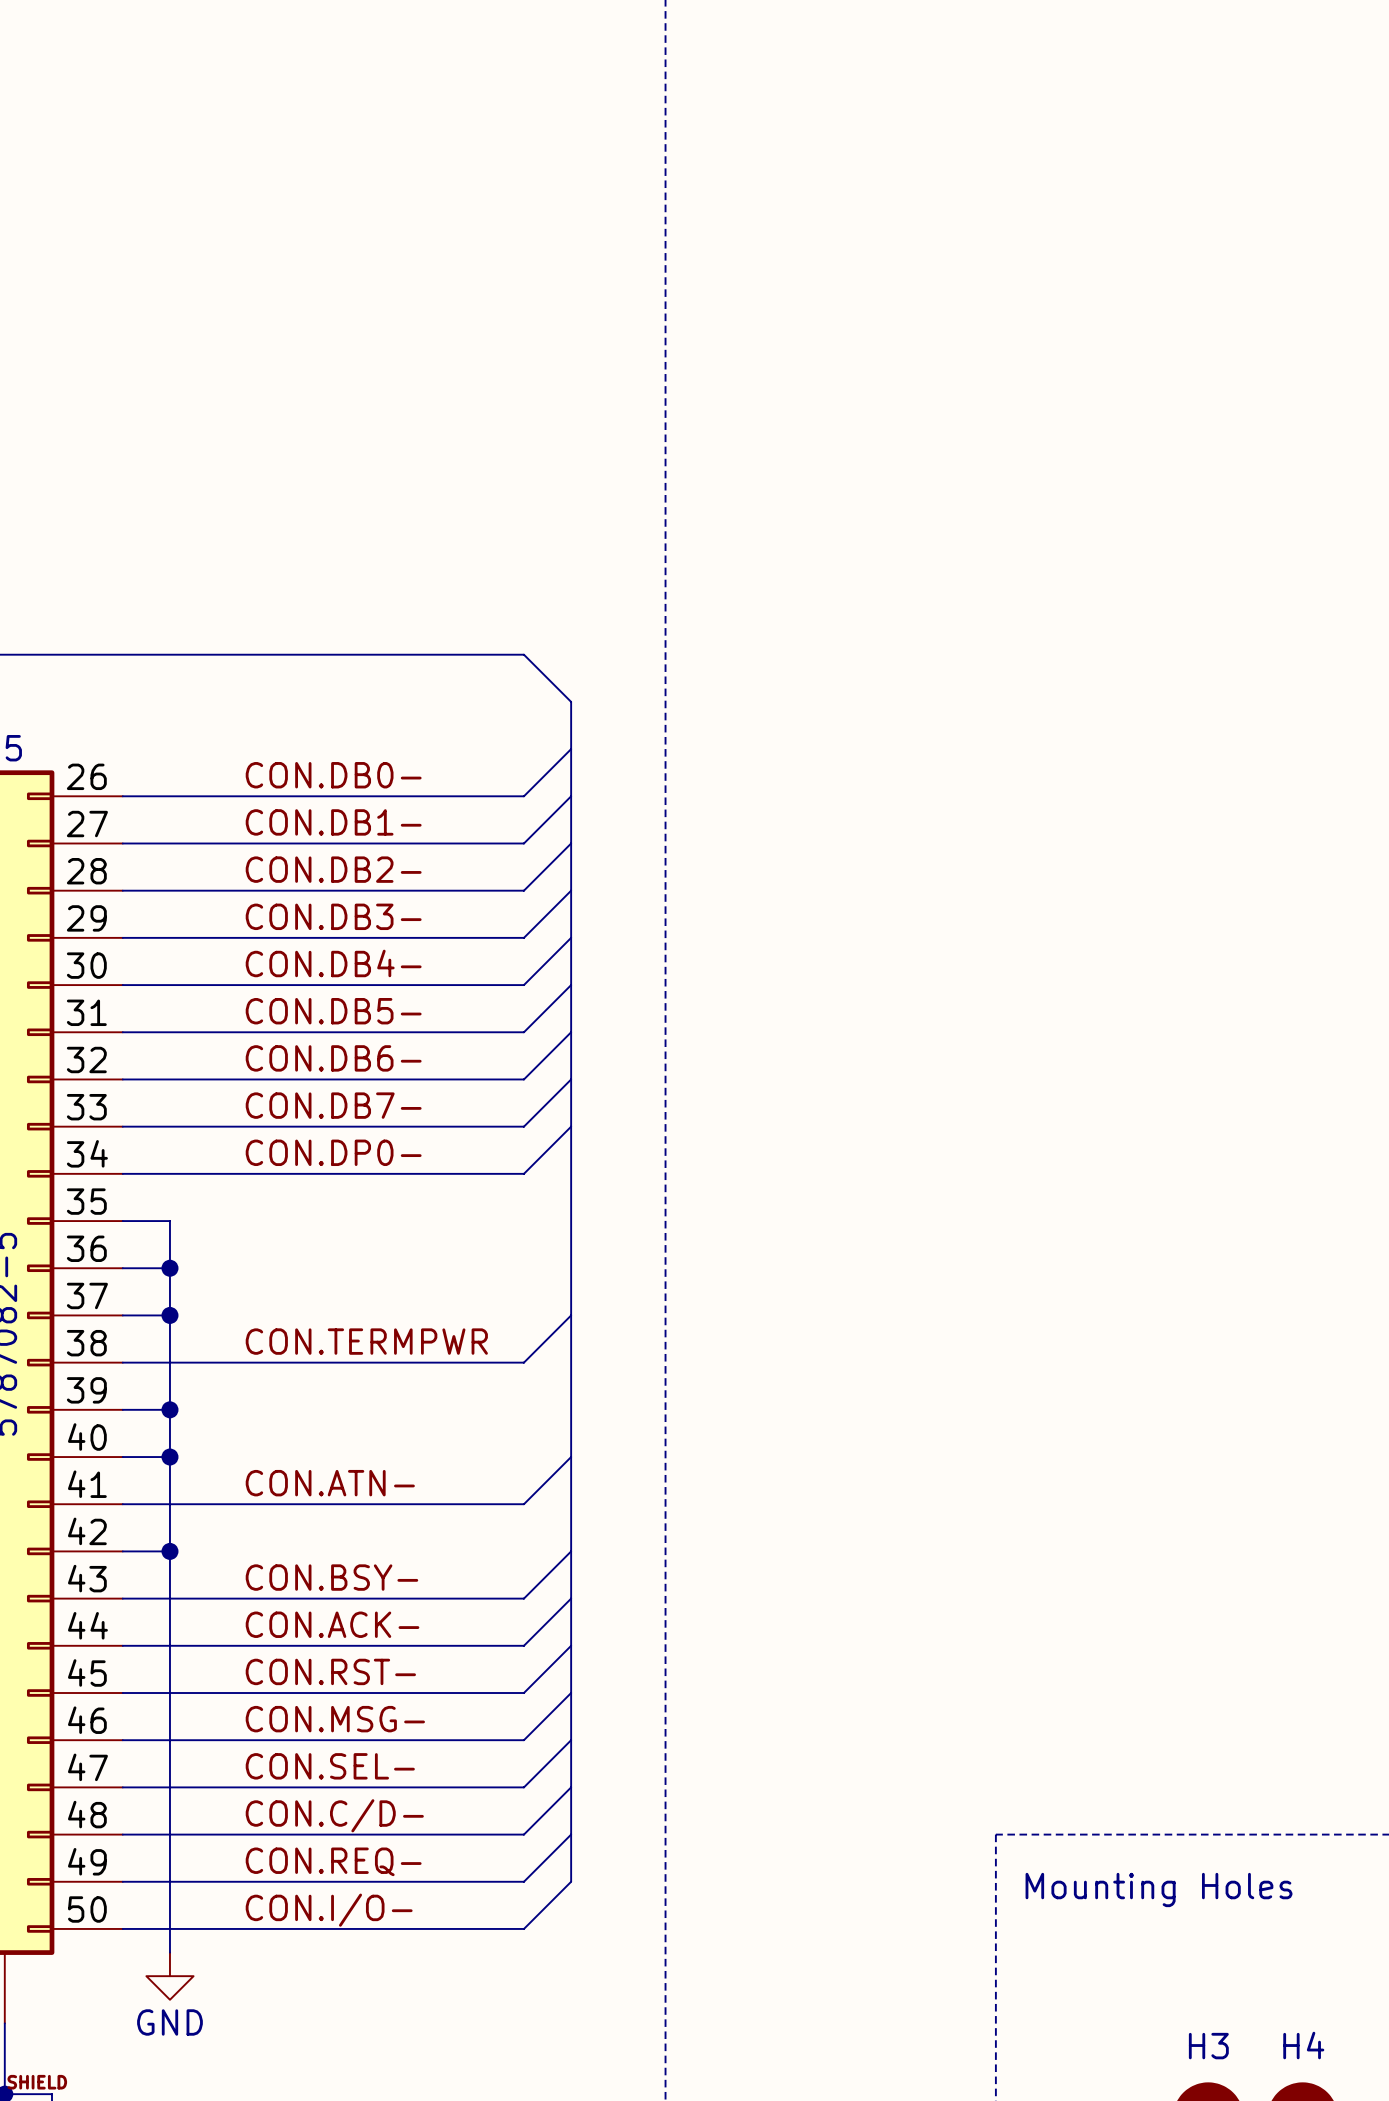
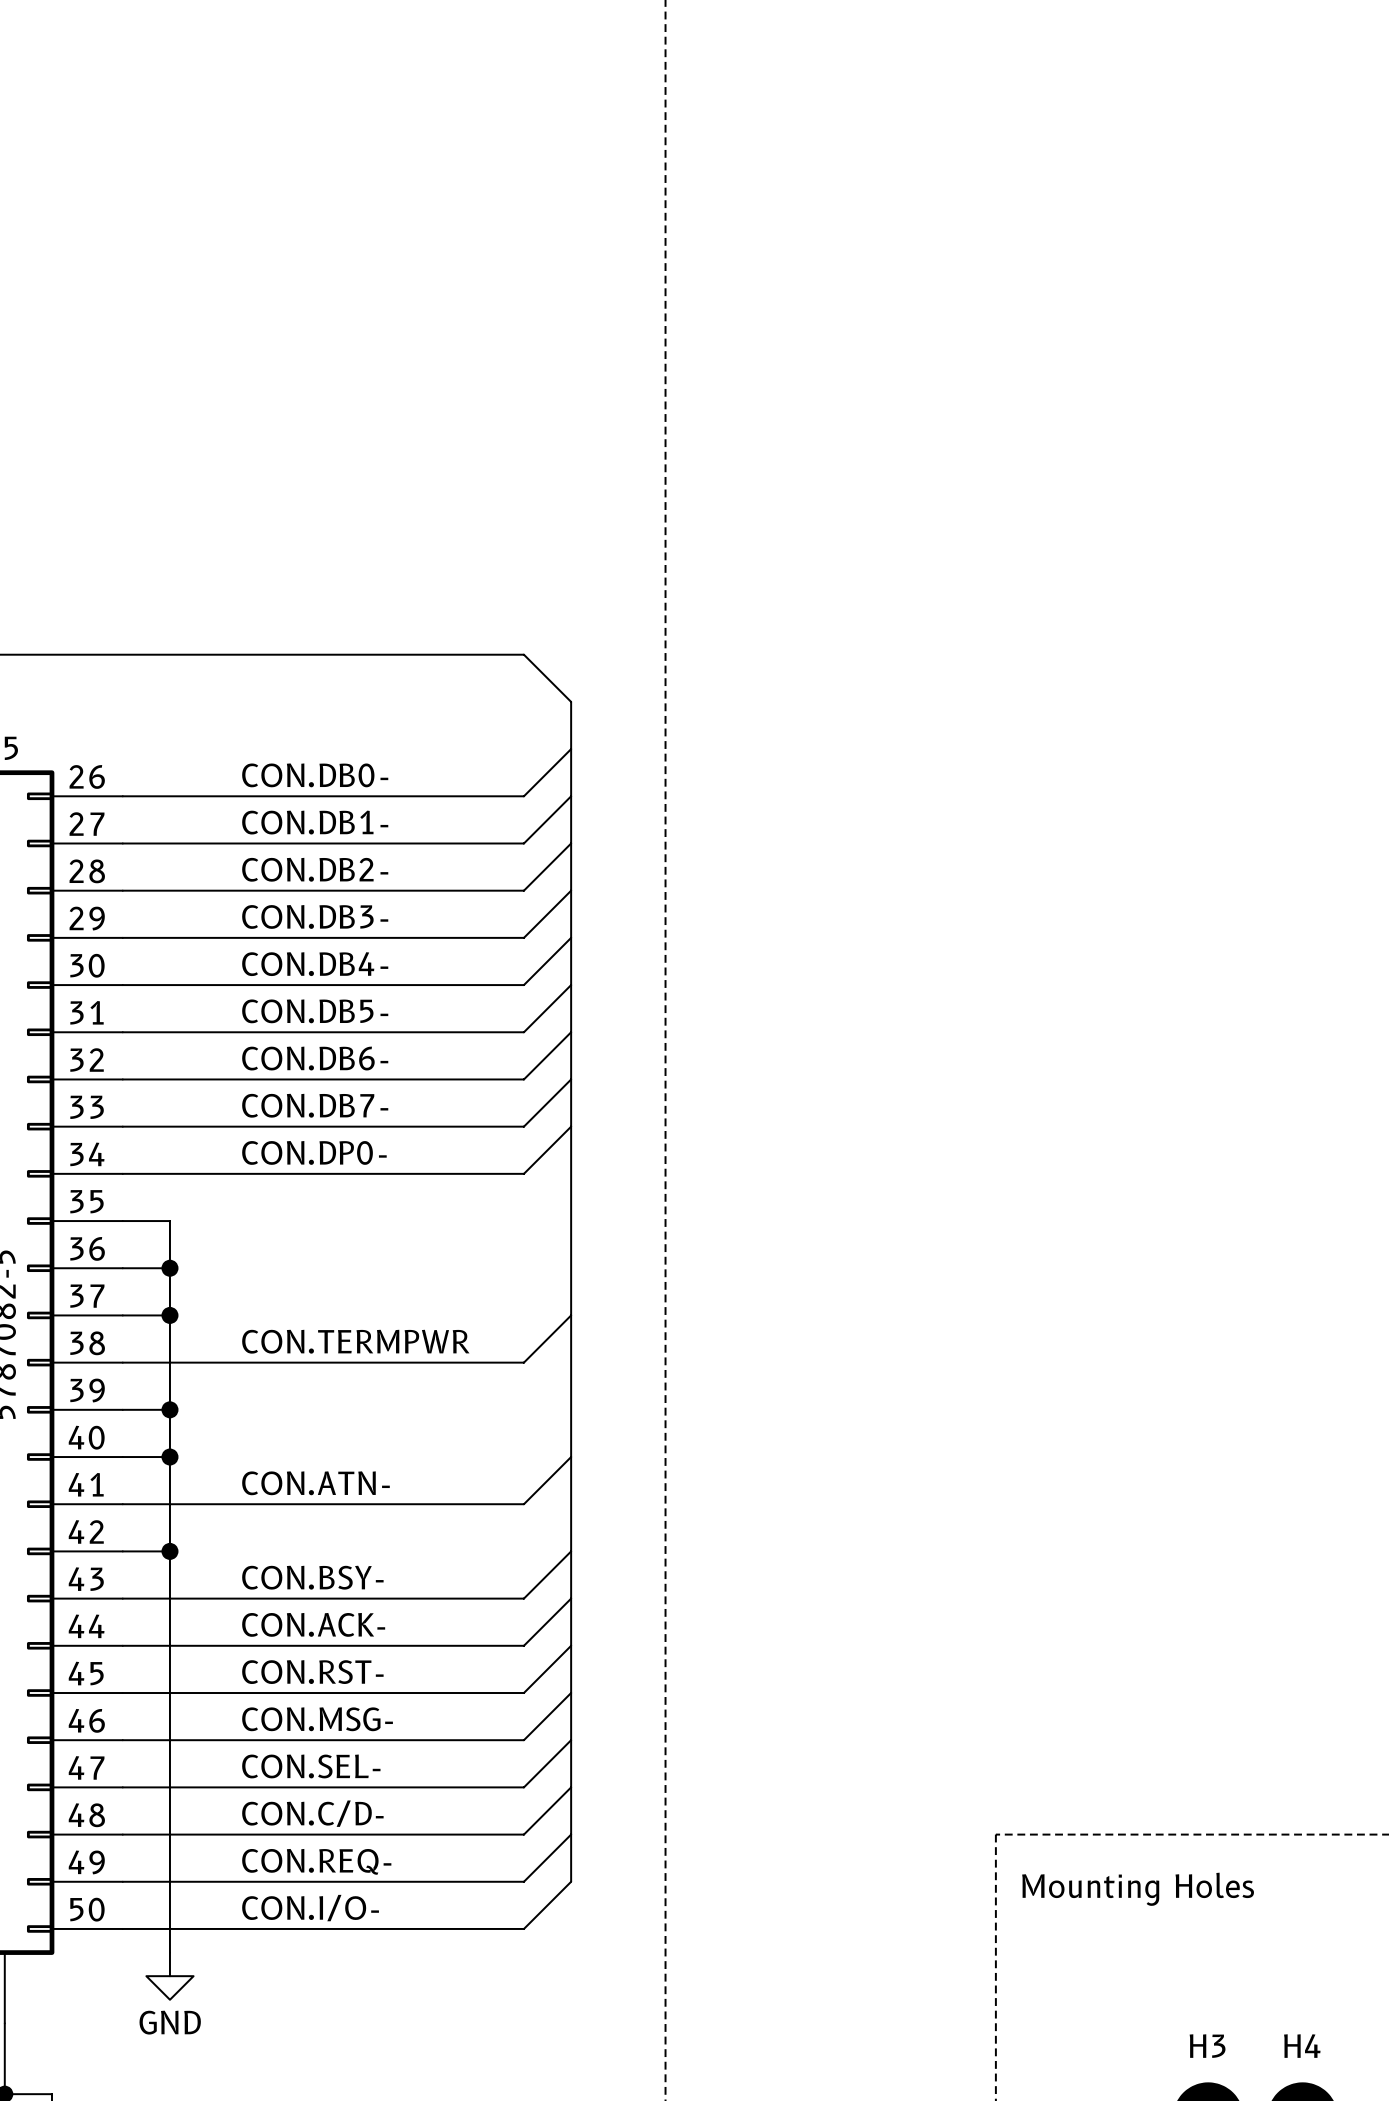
label: SHIELD (37, 2082) -> none

